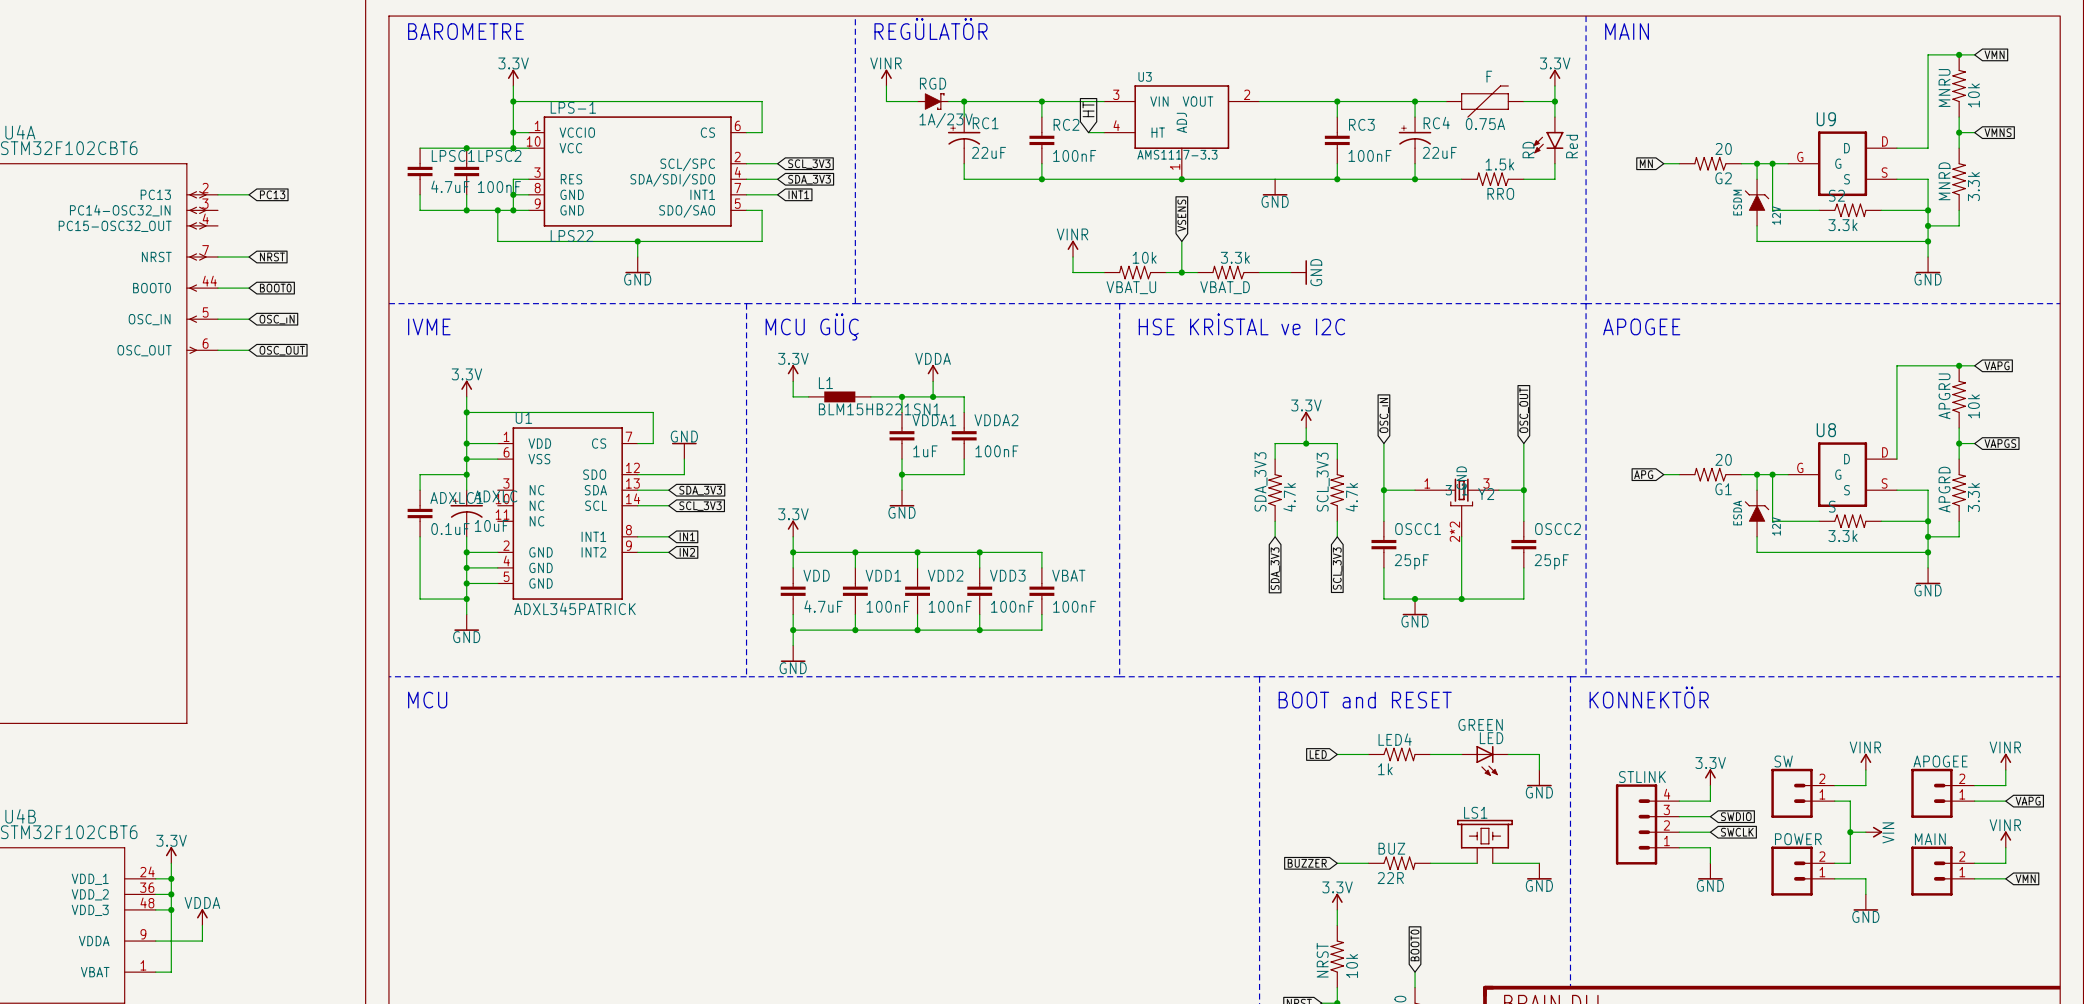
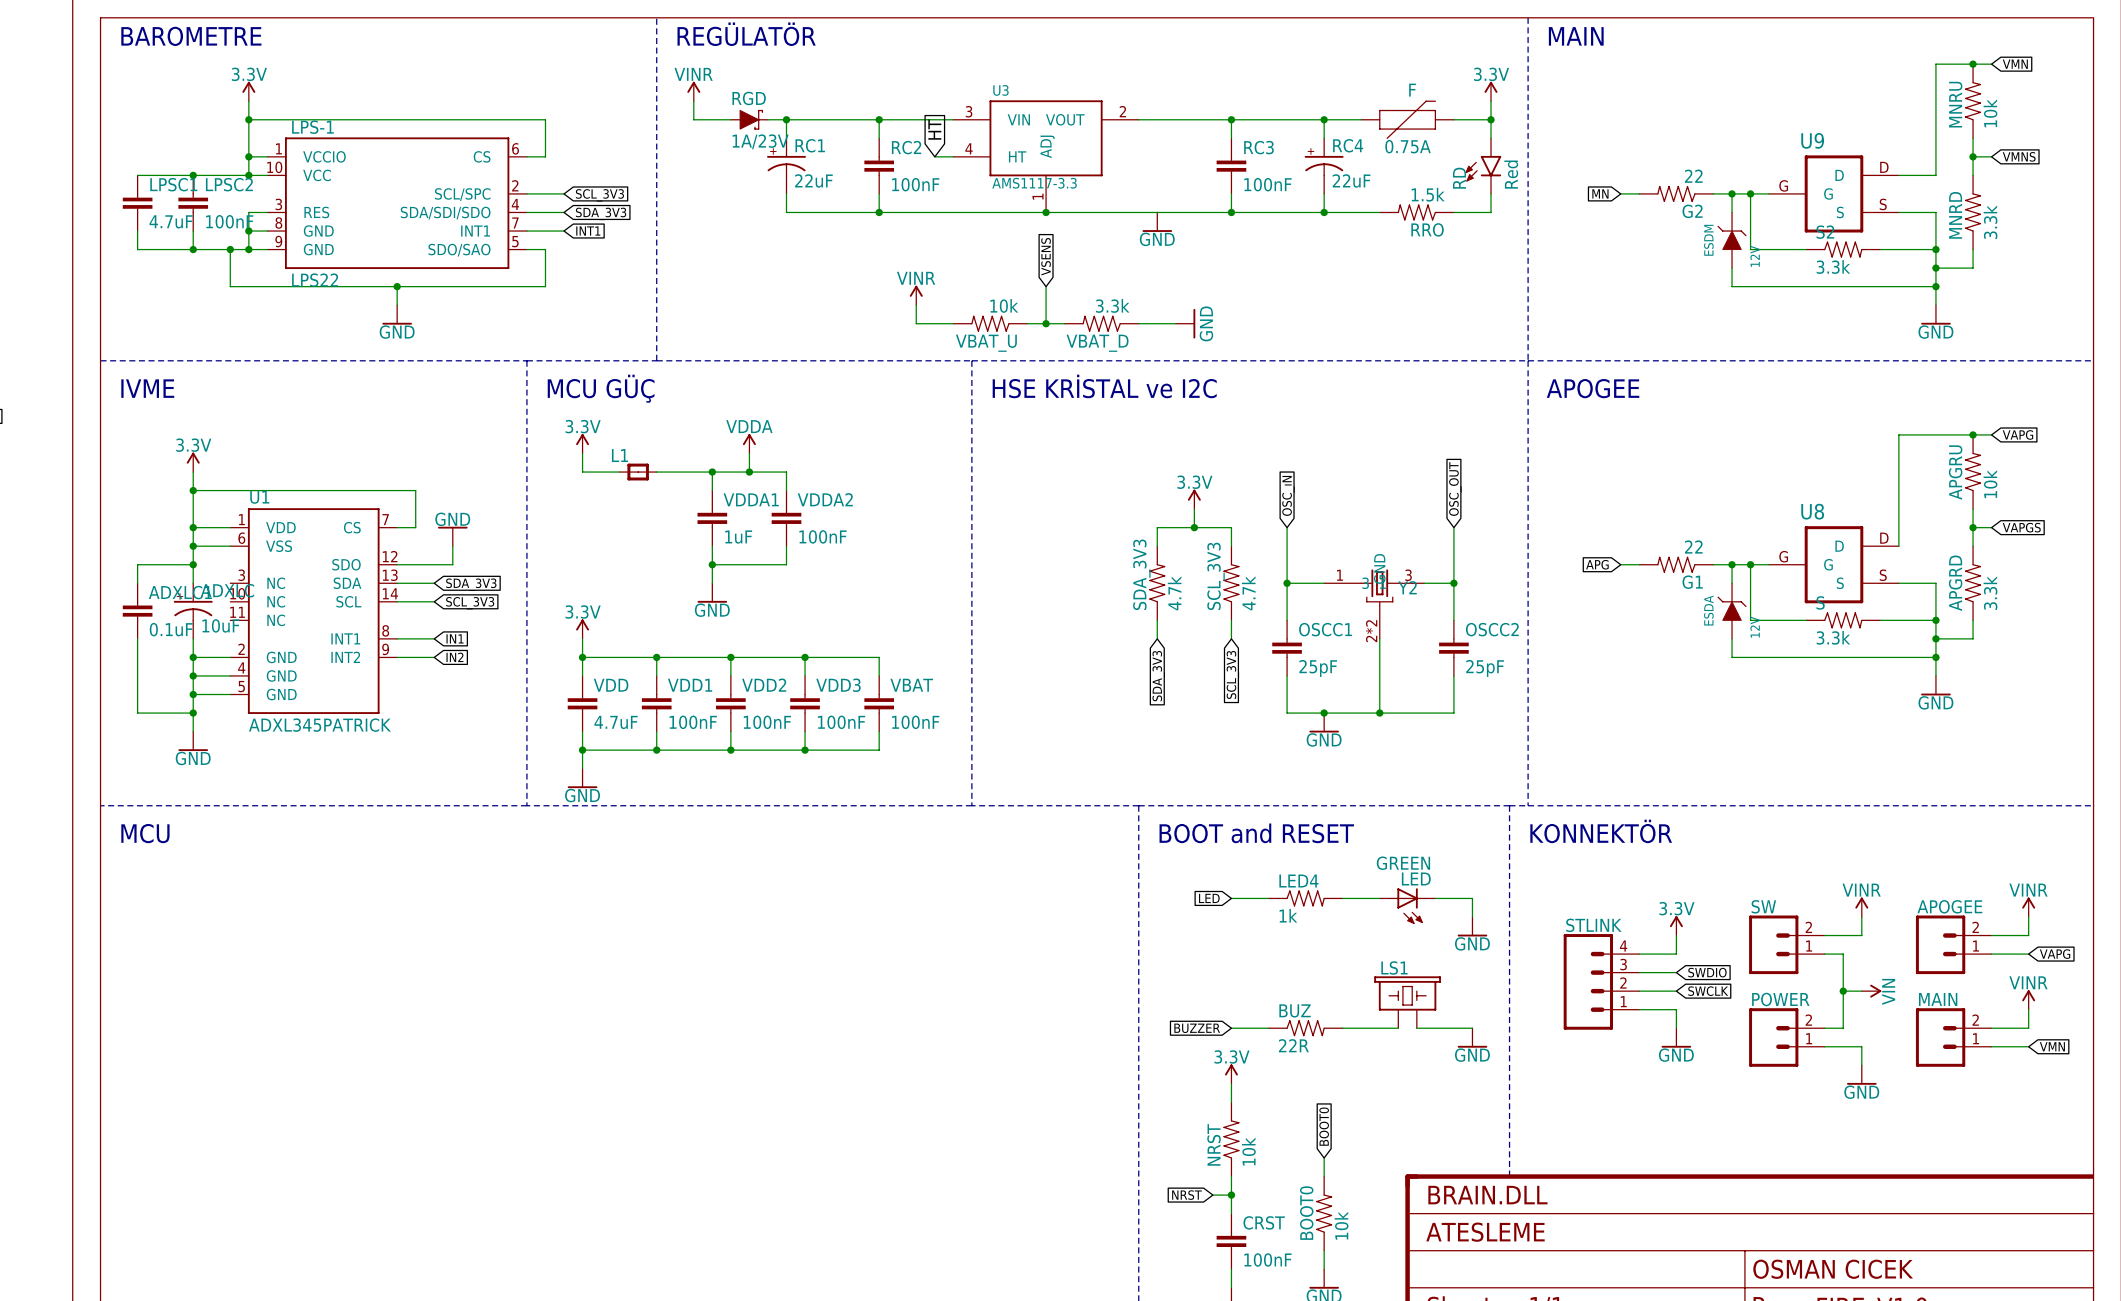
G2 value: 20 (1723, 148) -> 22 (1693, 176)
L1 symbol: [808, 391, 871, 403] -> [619, 463, 657, 481]
L1 value: BLM15HB221SN1 (879, 409) -> none
G1 value: 20 (1723, 459) -> 22 (1693, 547)

